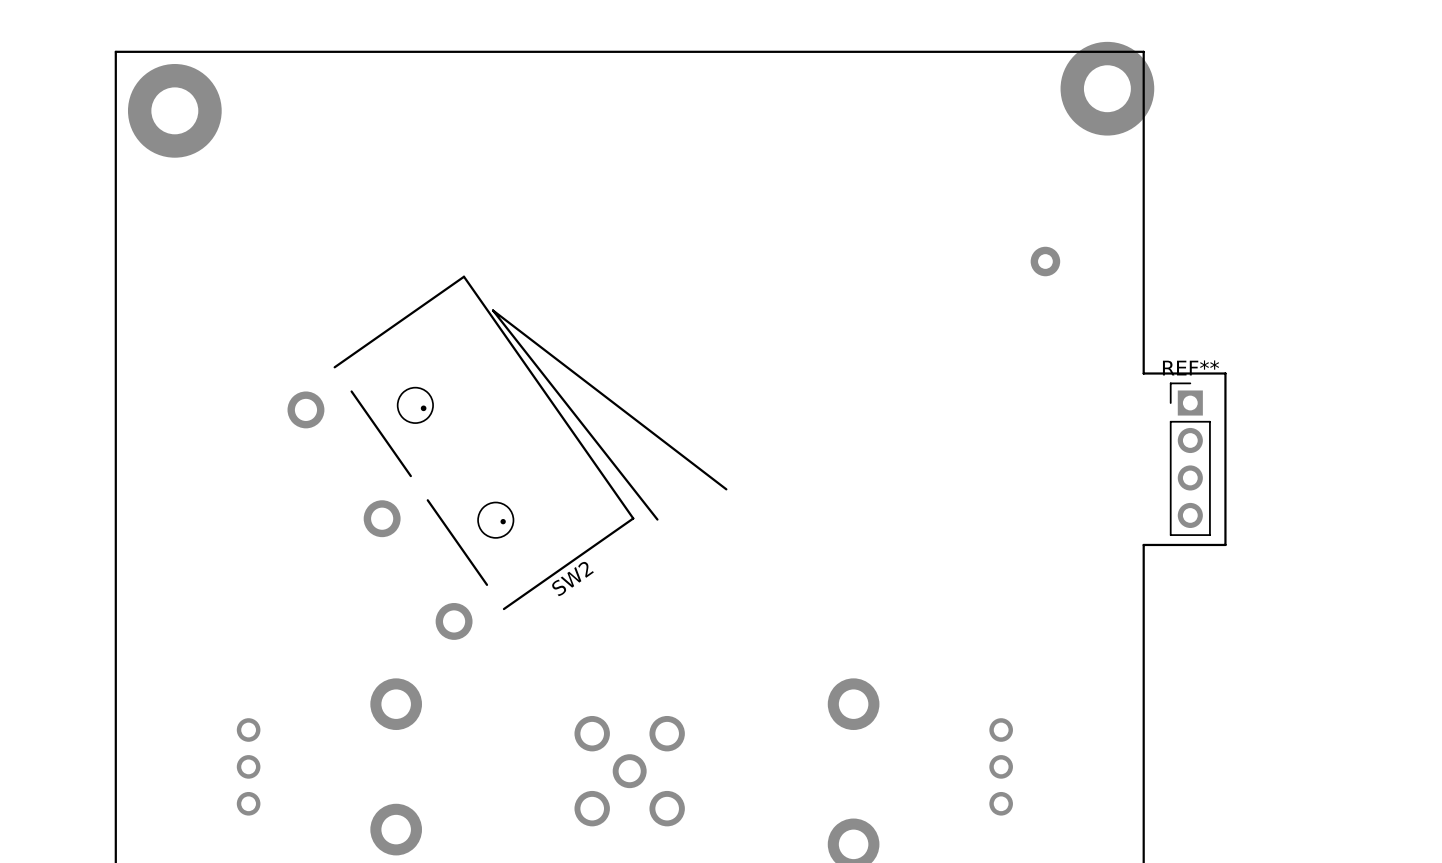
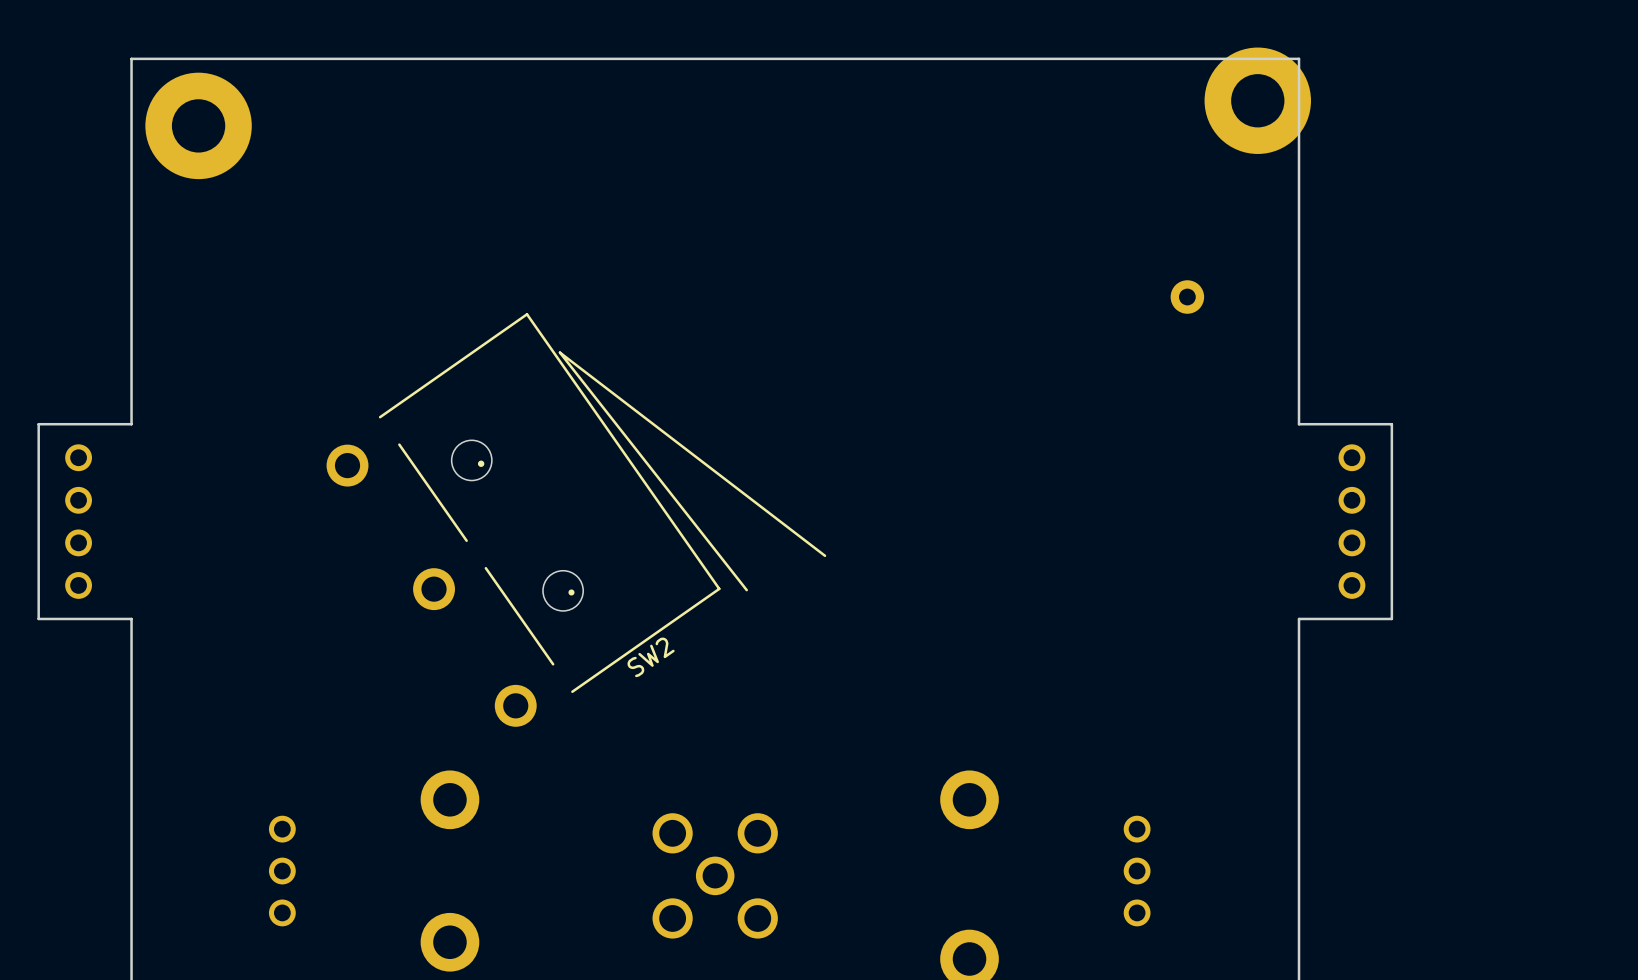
board edge: (115, 373) (115, 544) -> (131, 424) (38, 424) (38, 618) (131, 618)
part: none -> (78, 521)
REF**: (1190, 459) -> none
part: none -> (1351, 521)

